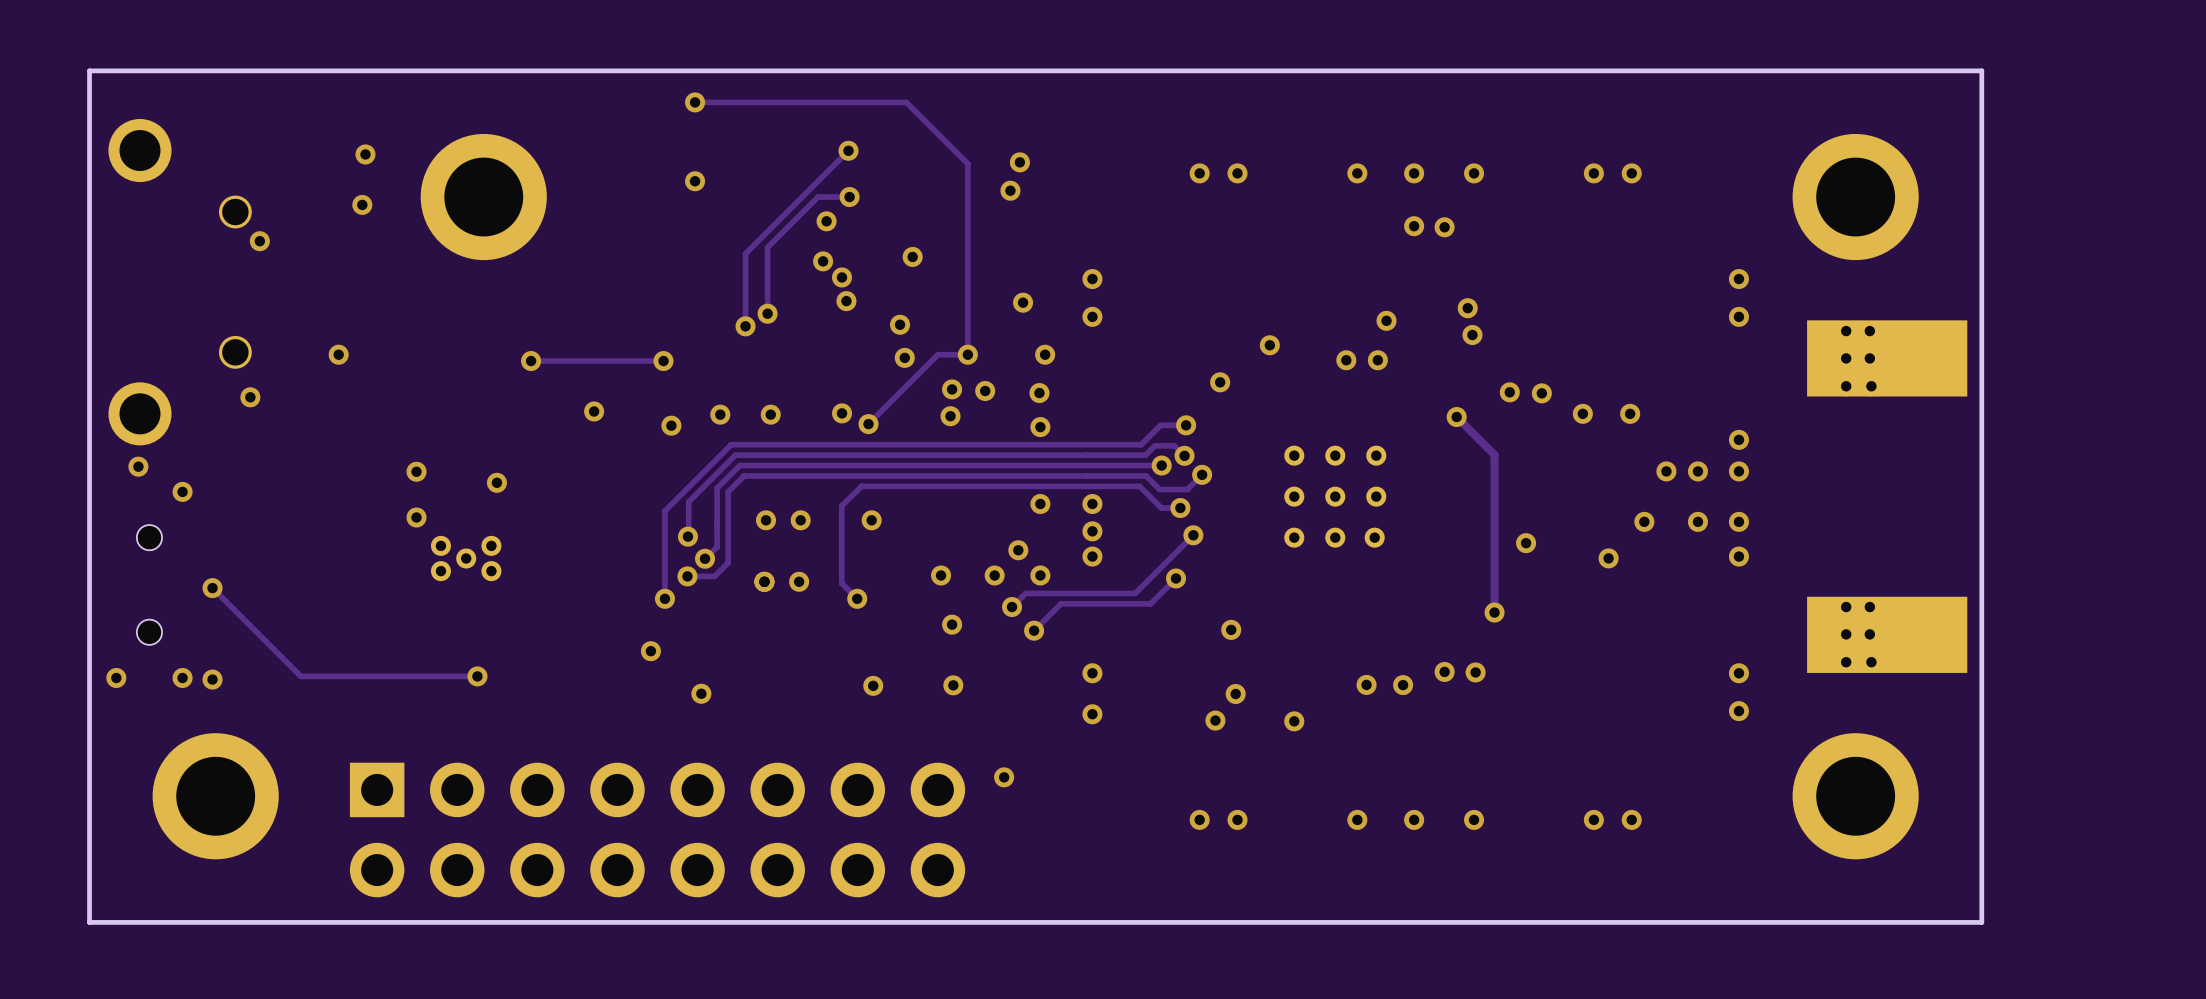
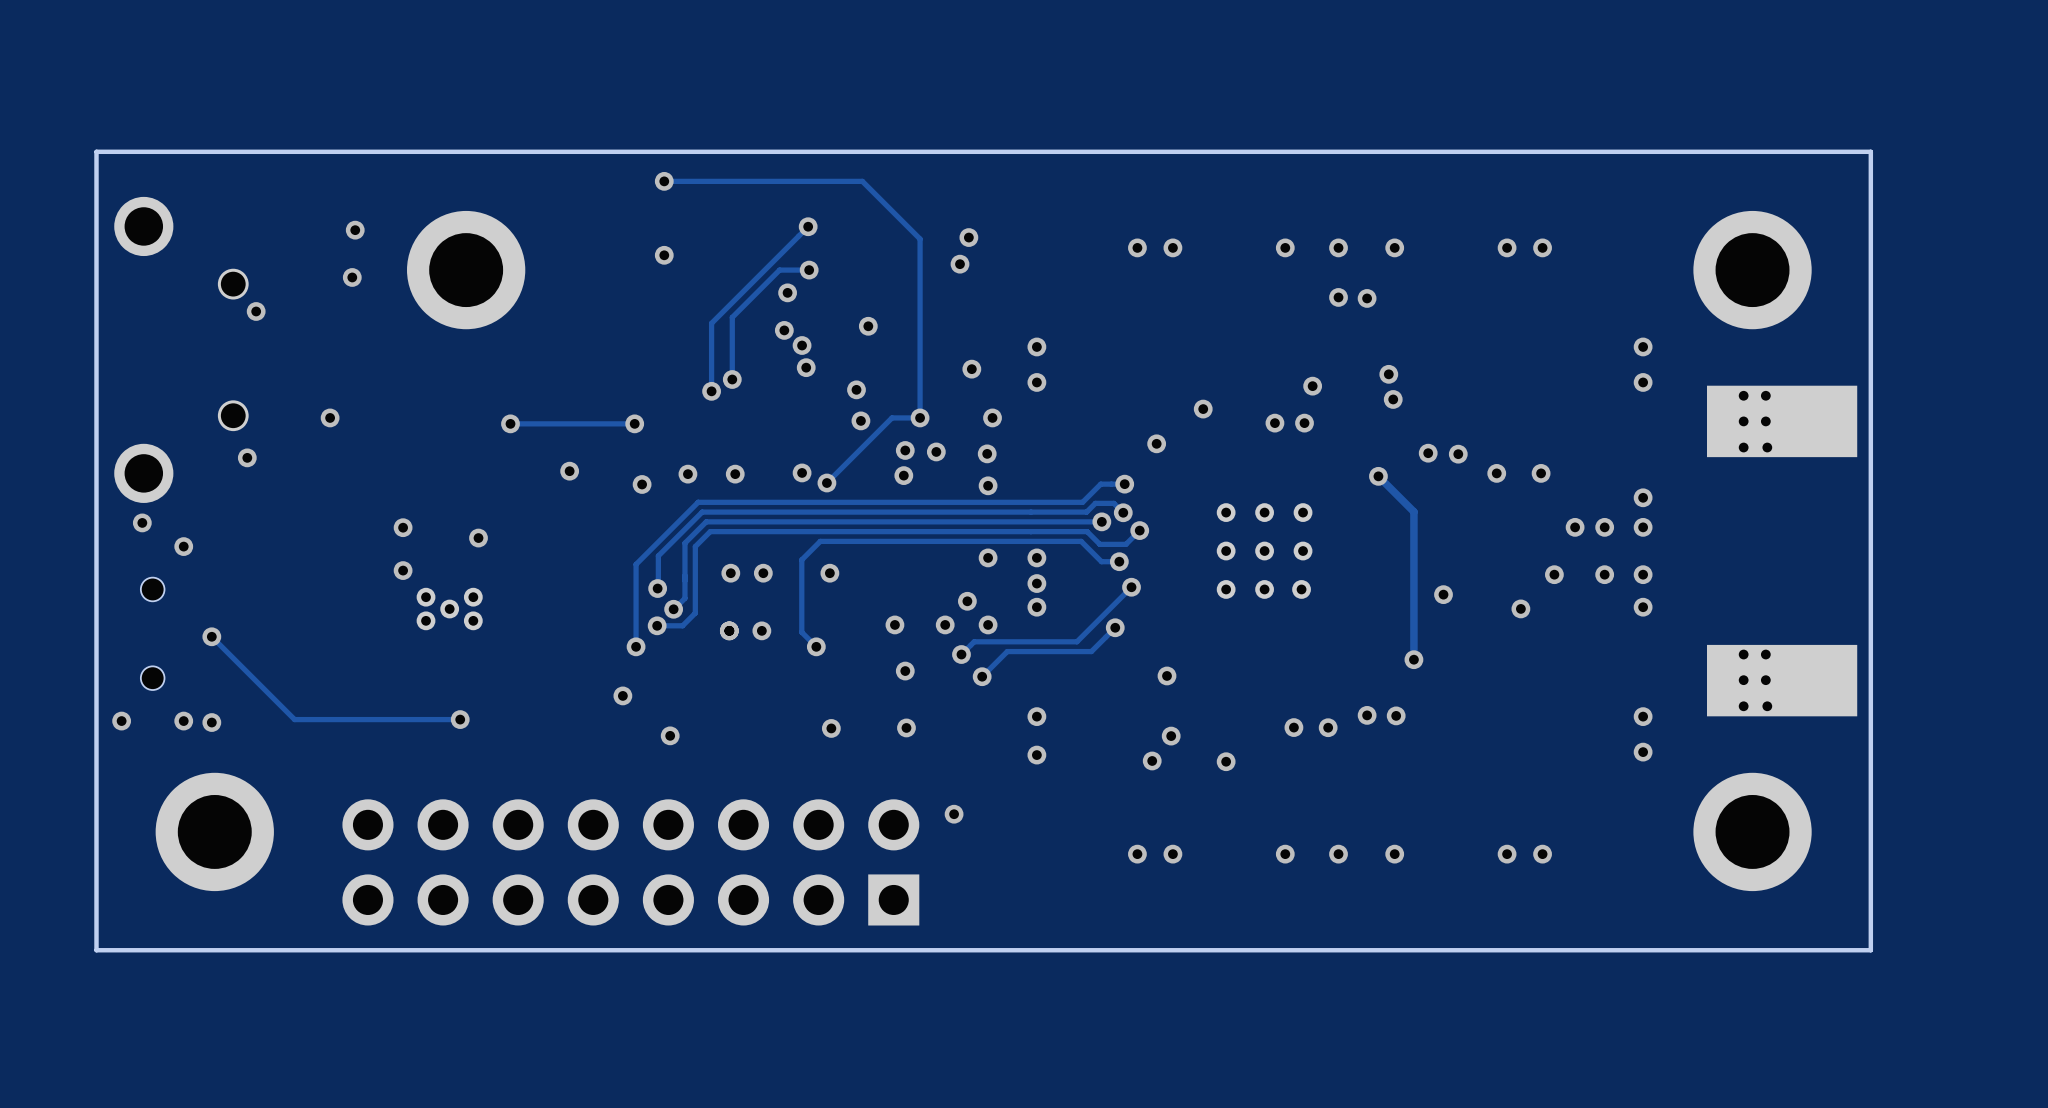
part rotation: 0° (657, 830) -> 180° (630, 862)

